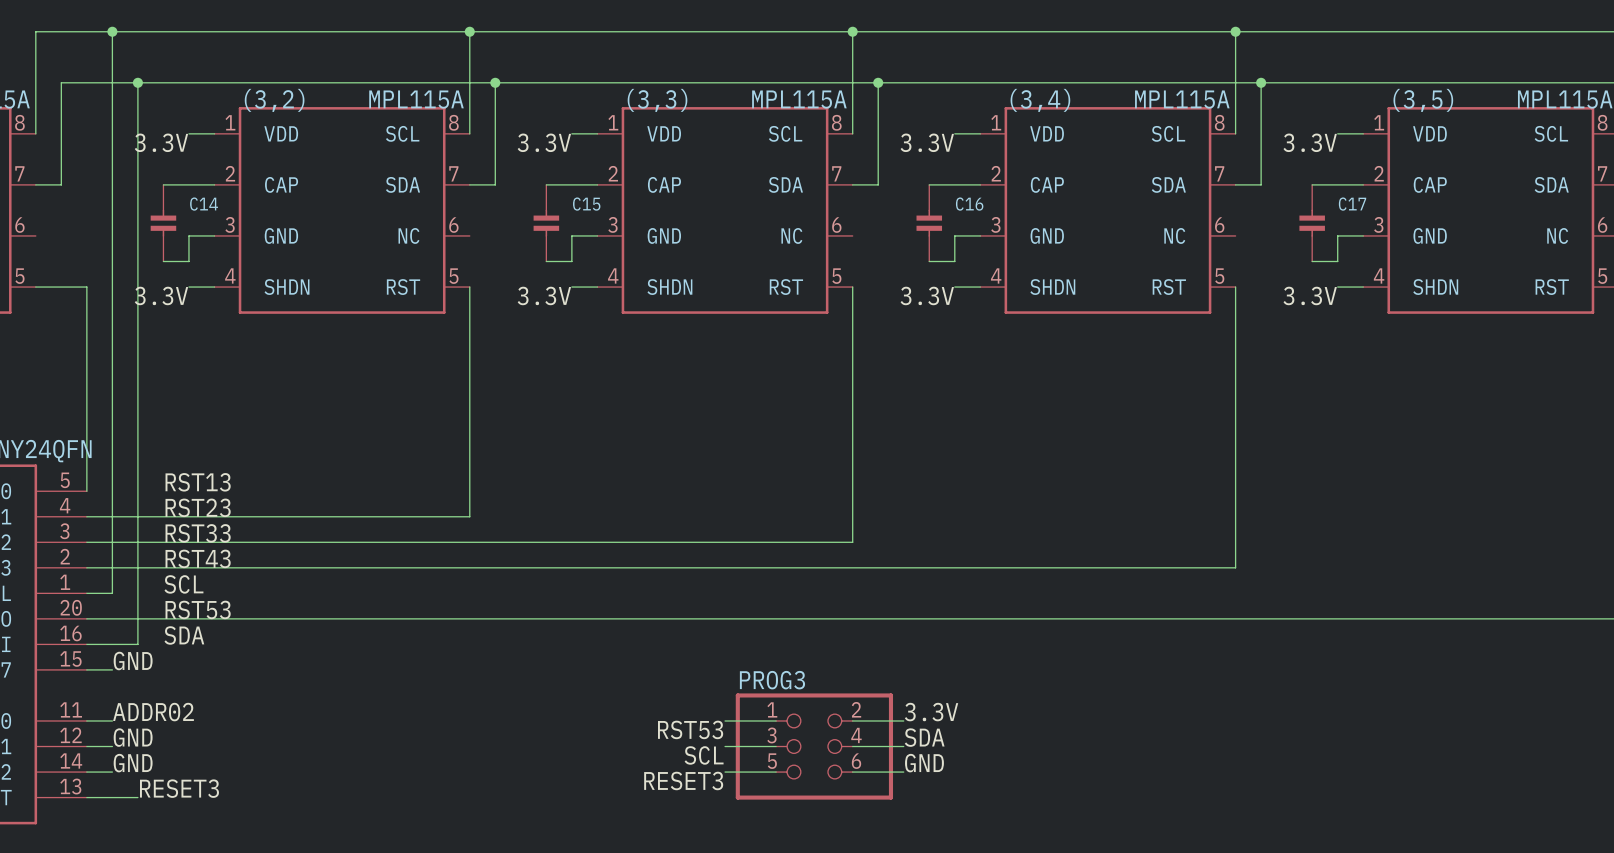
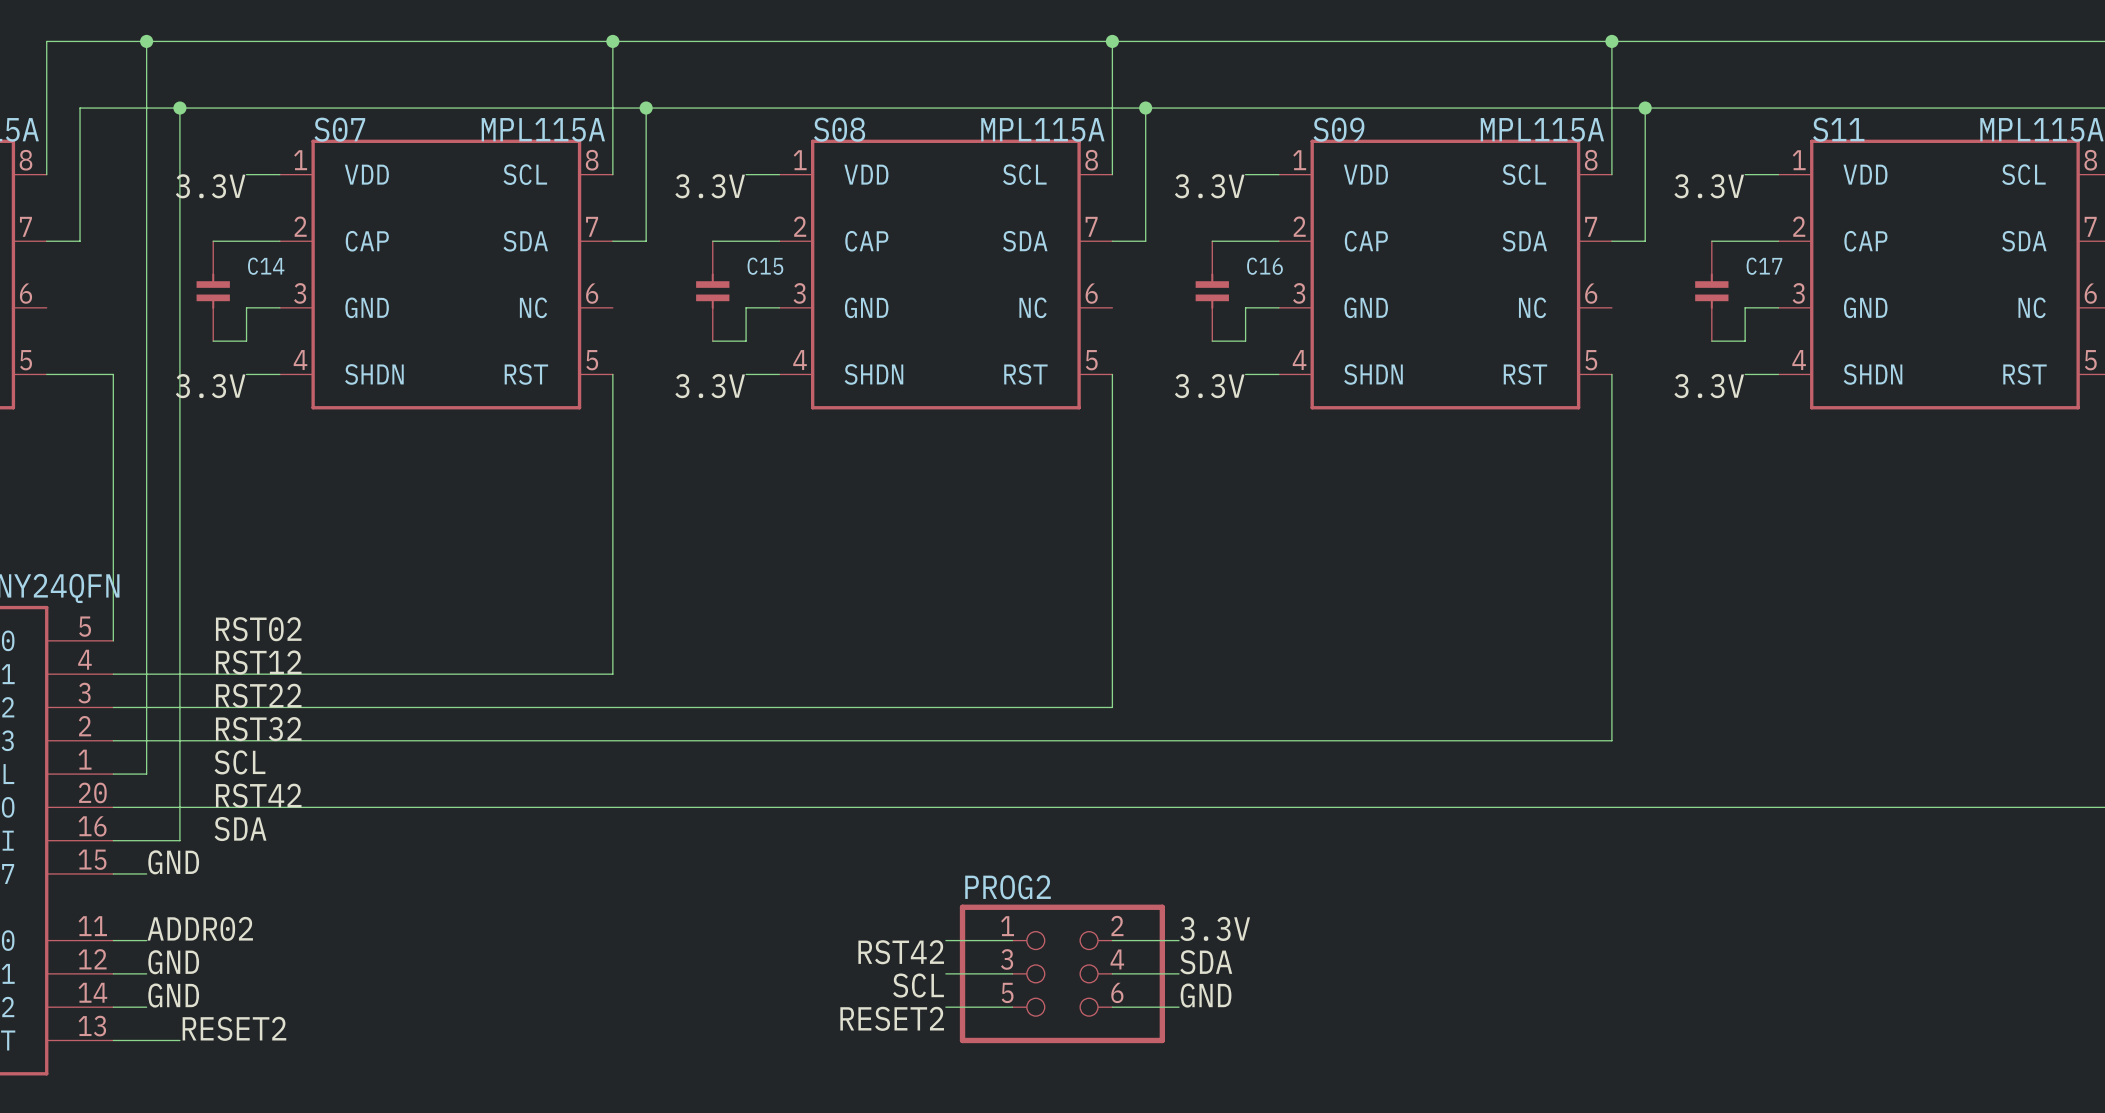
(3,2) name: (3,2) (274, 100) -> S07 (339, 129)
(3,3) name: (3,3) (657, 100) -> S08 (839, 129)
(3,4) name: (3,4) (1040, 100) -> S09 (1338, 129)
(3,5) name: (3,5) (1423, 100) -> S11 (1838, 129)
label: RST13 (198, 482) -> RST02 (258, 629)
label: RST23 (198, 507) -> RST12 (258, 662)
label: RST33 (198, 533) -> RST22 (258, 695)
label: RST43 (198, 558) -> RST32 (258, 729)
label: RST53 (198, 609) -> RST42 (258, 795)
PROG3 name: PROG3 (772, 680) -> PROG2 (1008, 887)
label: RST53 (690, 729) -> RST42 (901, 952)
label: RESET3 (683, 780) -> RESET2 (892, 1018)
label: RESET3 (179, 788) -> RESET2 (234, 1028)

